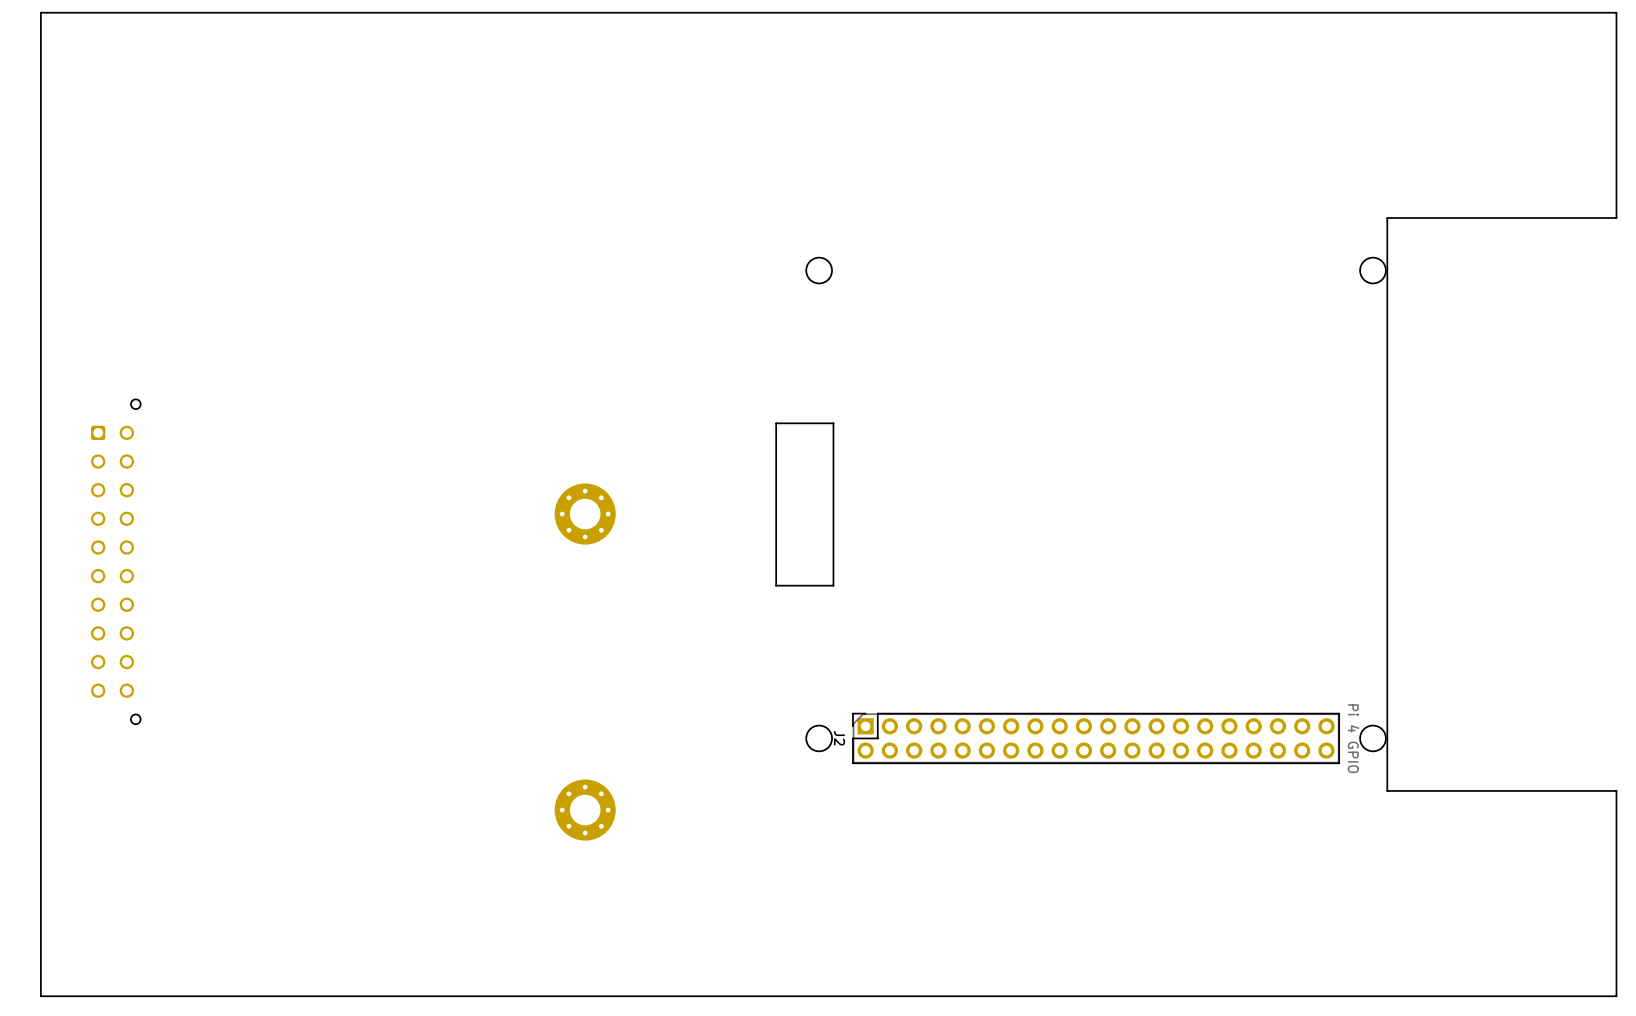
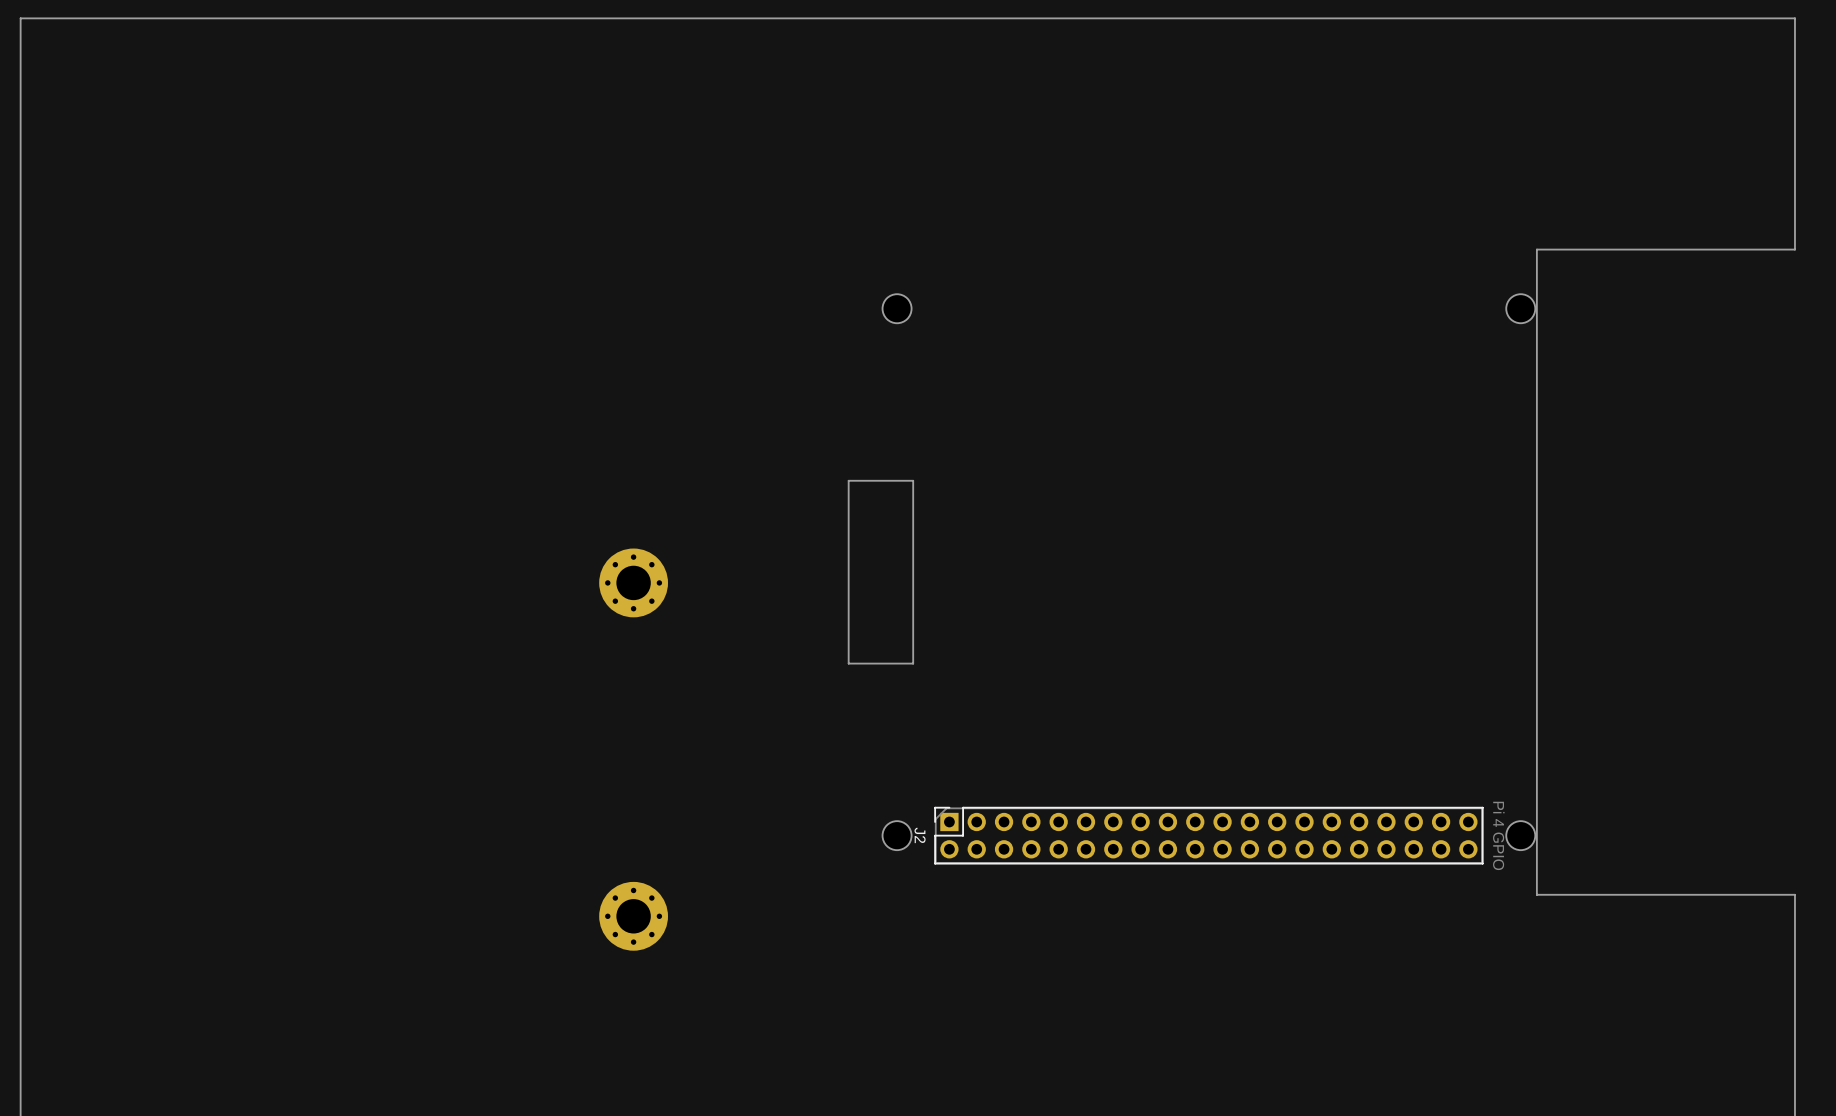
part: (115, 561) -> none

